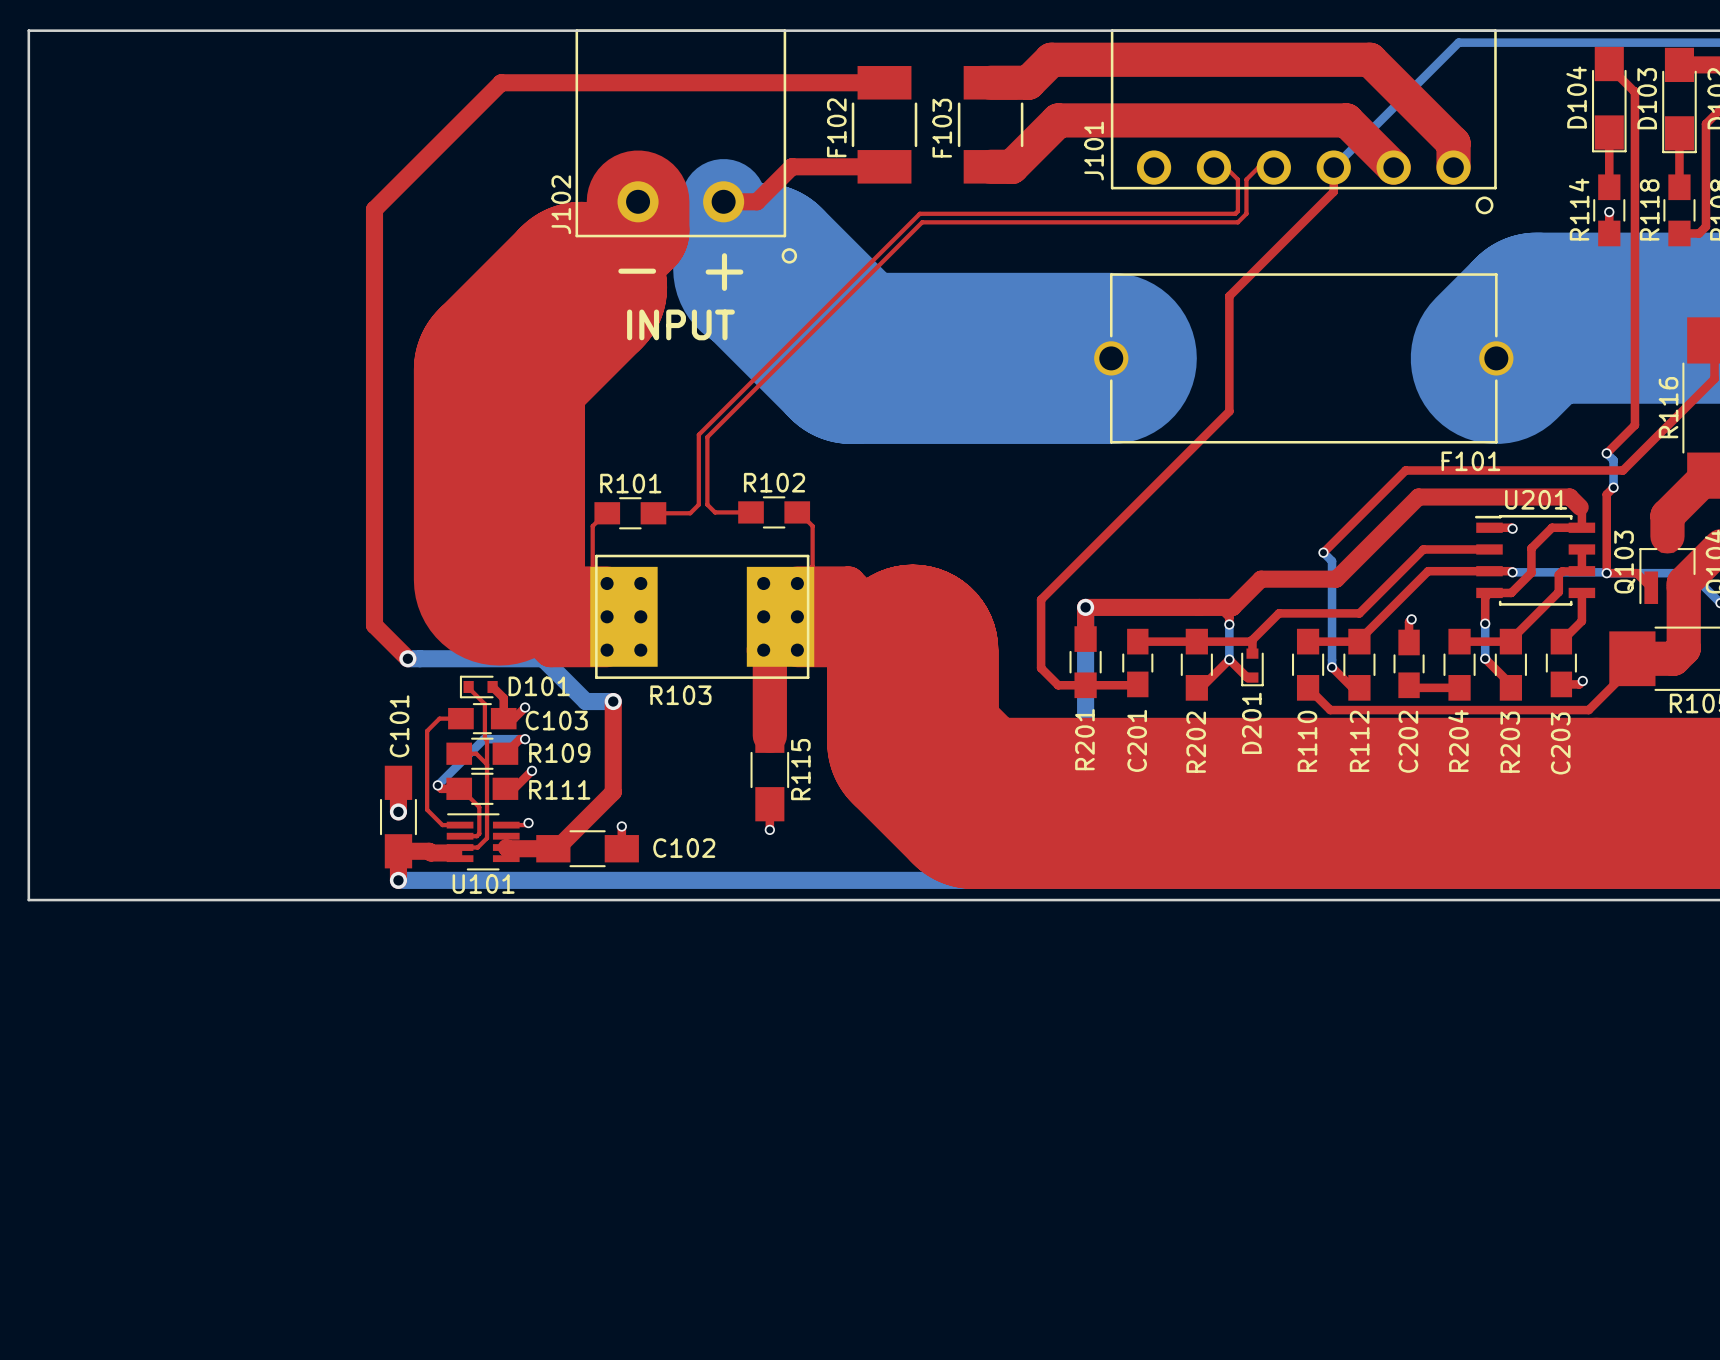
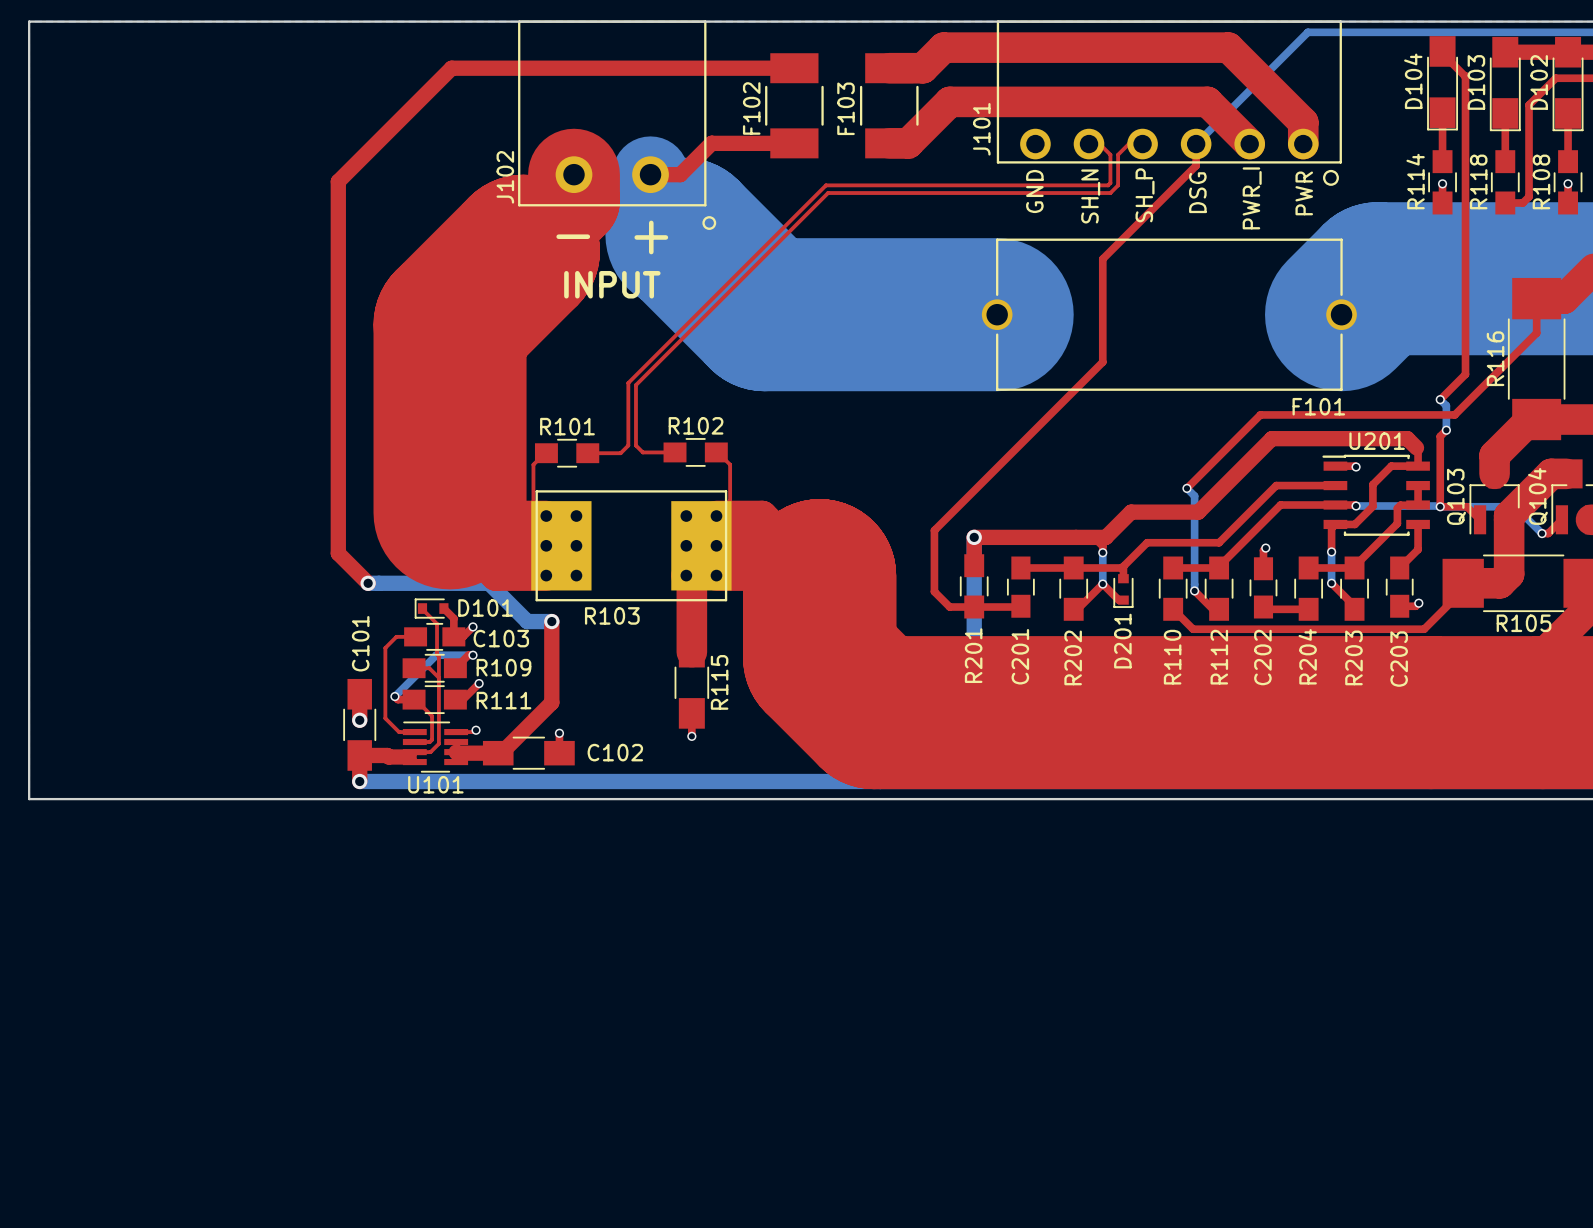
text: none -> GND (1034, 191)
text: none -> DSG (1197, 192)
text: none -> PWR (1304, 193)
text: none -> SH_P (1145, 195)
text: none -> SH_N (1090, 196)
text: none -> PWR_I (1252, 198)

